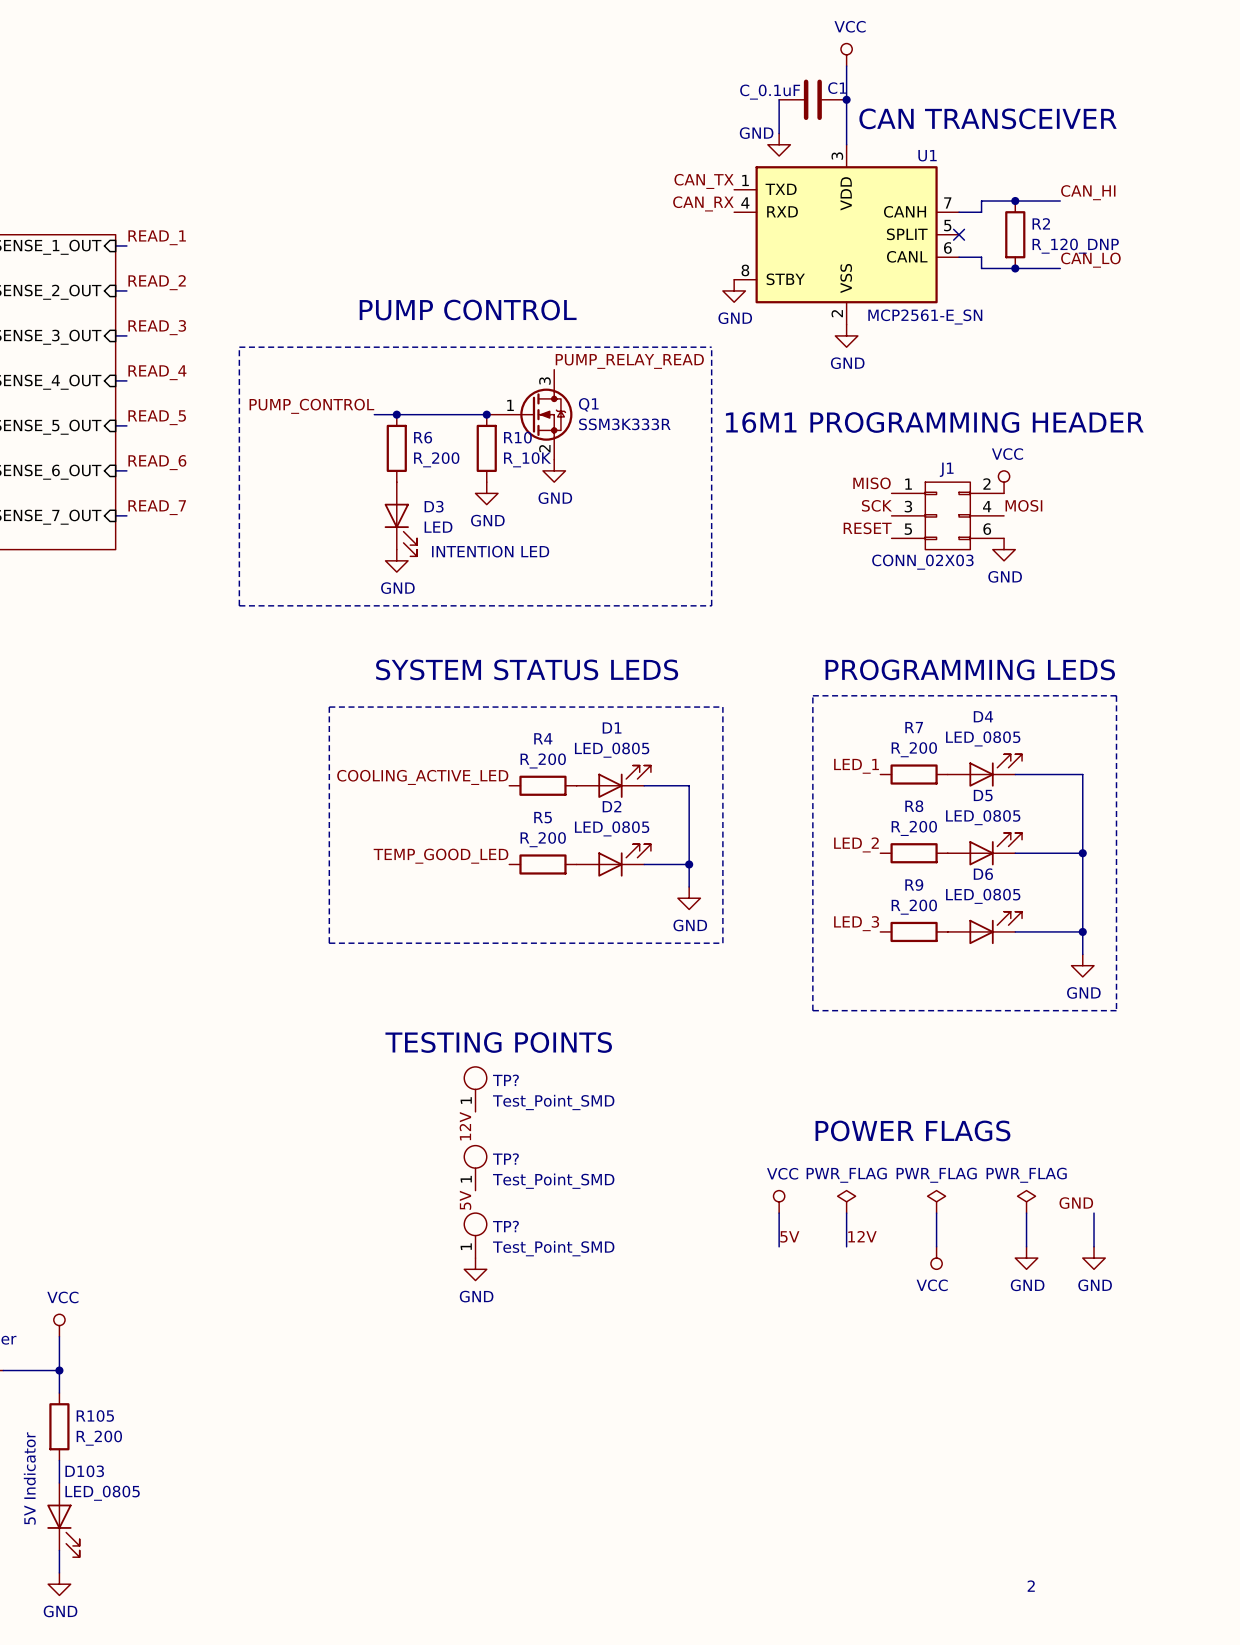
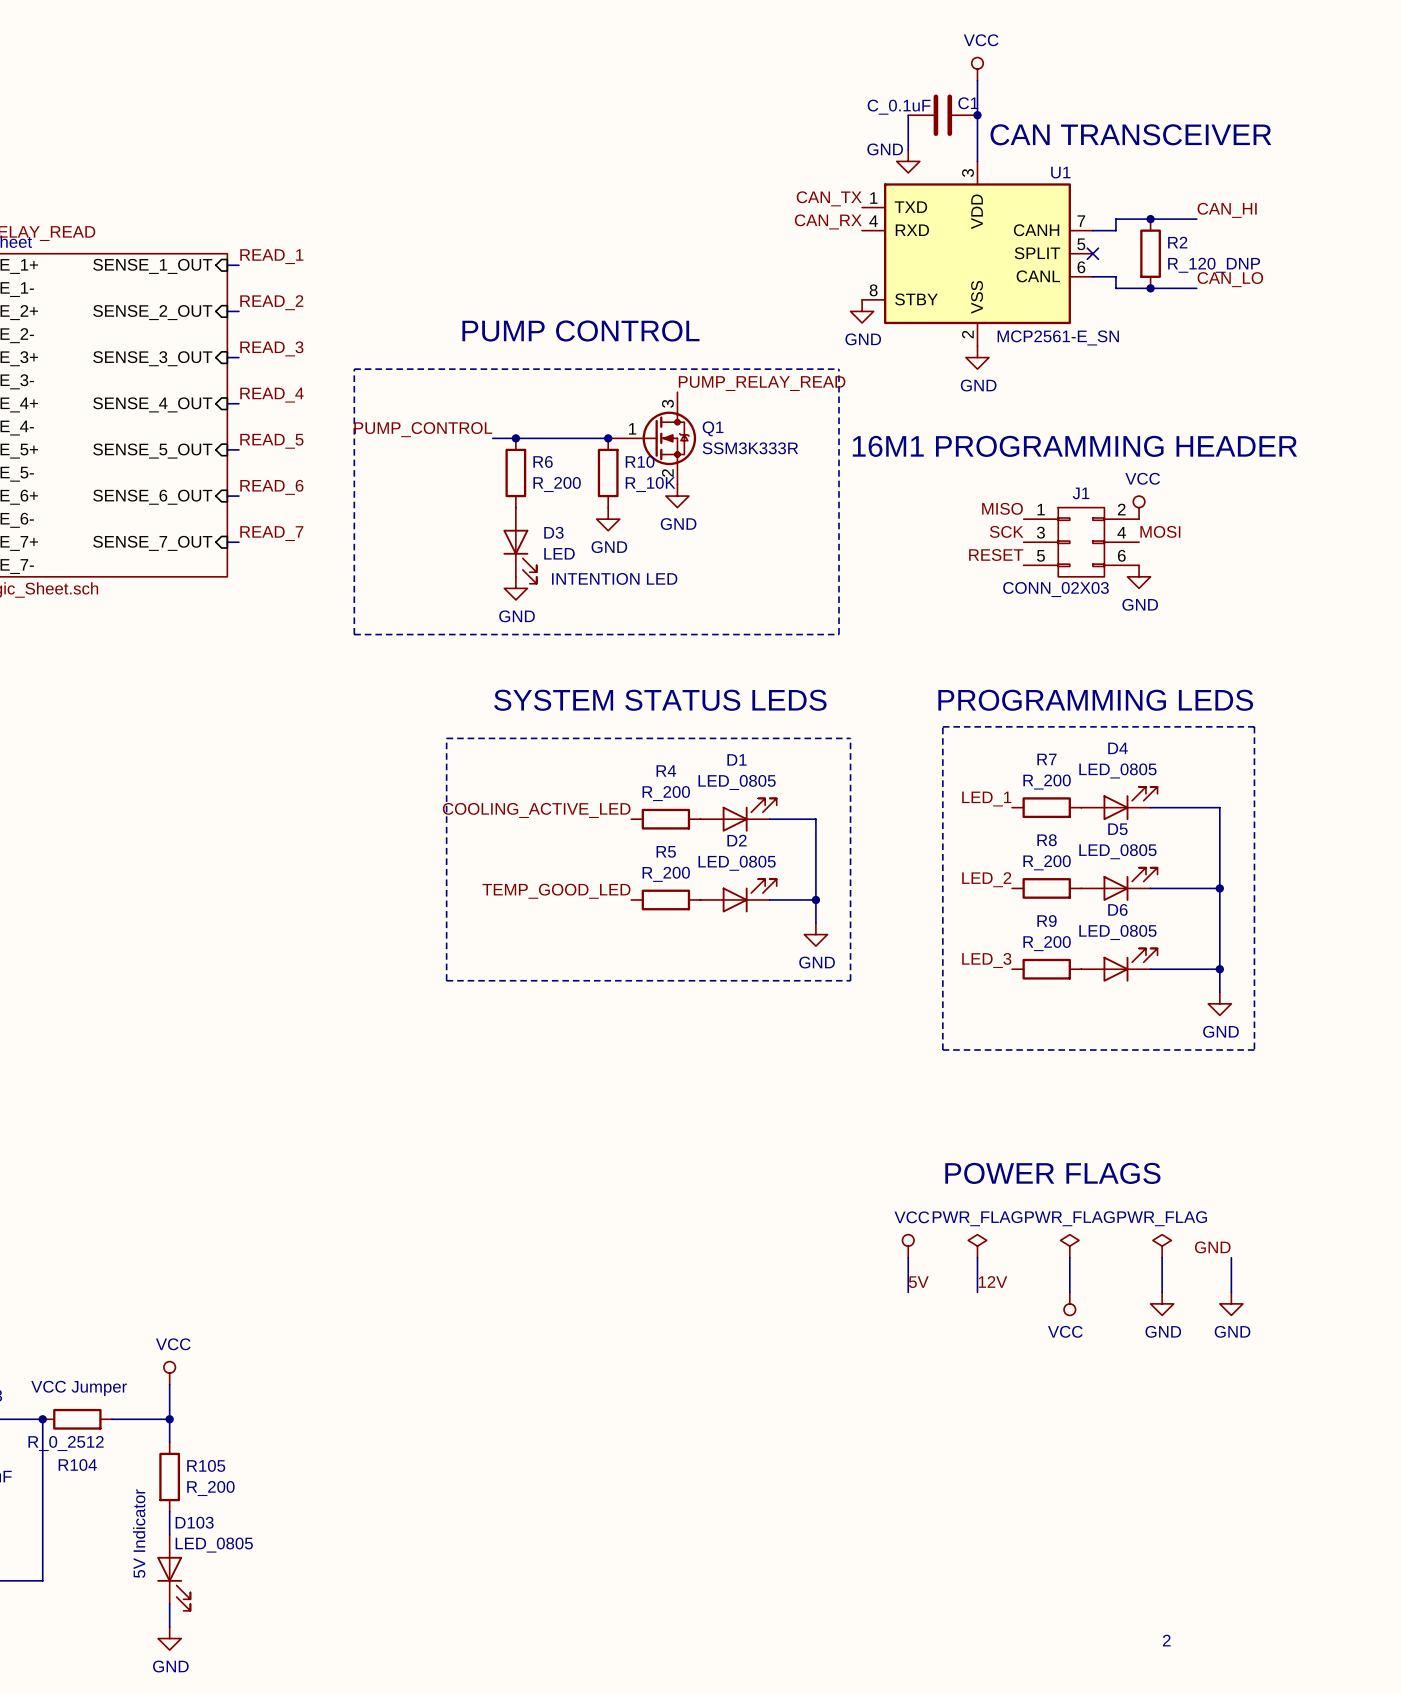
text: TESTING POINTS (498, 1042) -> none
TP?: Test_Point_SMD (475, 1089) -> none
label: 12V (465, 1126) -> none
TP?: Test_Point_SMD (475, 1168) -> none
label: 5V (465, 1200) -> none
TP?: Test_Point_SMD (475, 1235) -> none
power symbol: GND (475, 1269) -> none

